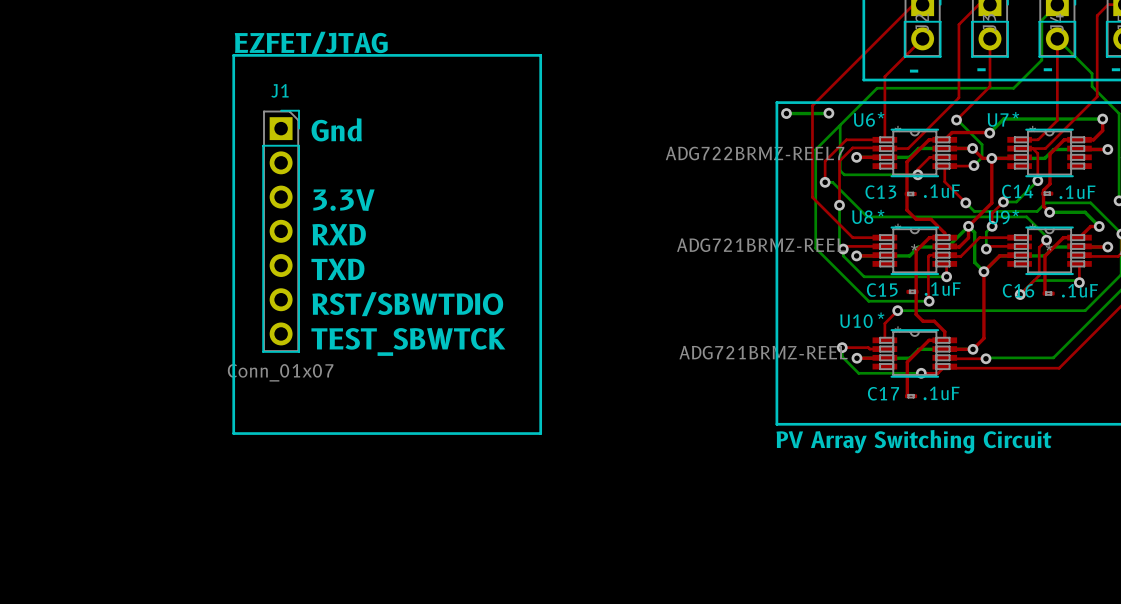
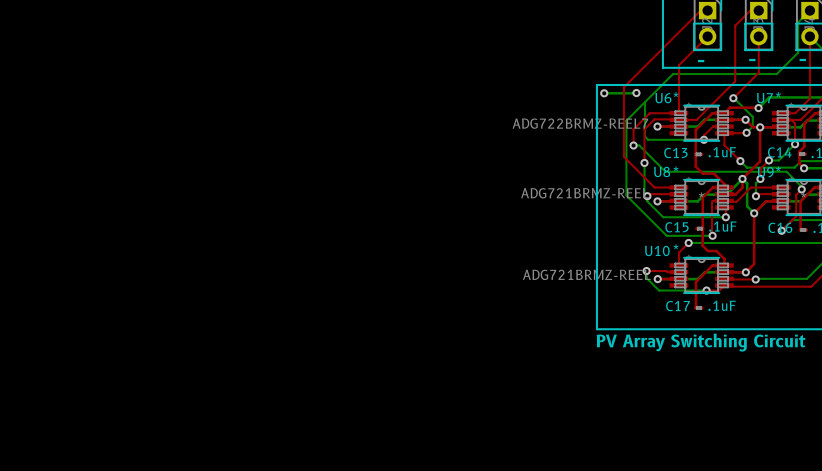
text: EZFET/JTAG (311, 42) -> none
line: (233, 55) (540, 55) (540, 433) (233, 433) (233, 55) -> none
text: Gnd (336, 129) -> none
text: 3.3V (343, 200) -> none
J1: Conn_01x07 (281, 231) -> none
text: RXD (339, 234) -> none
text: TXD (337, 269) -> none
text: RST/SBWTDIO (407, 304) -> none
text: TEST_SBWTCK (408, 341) -> none

